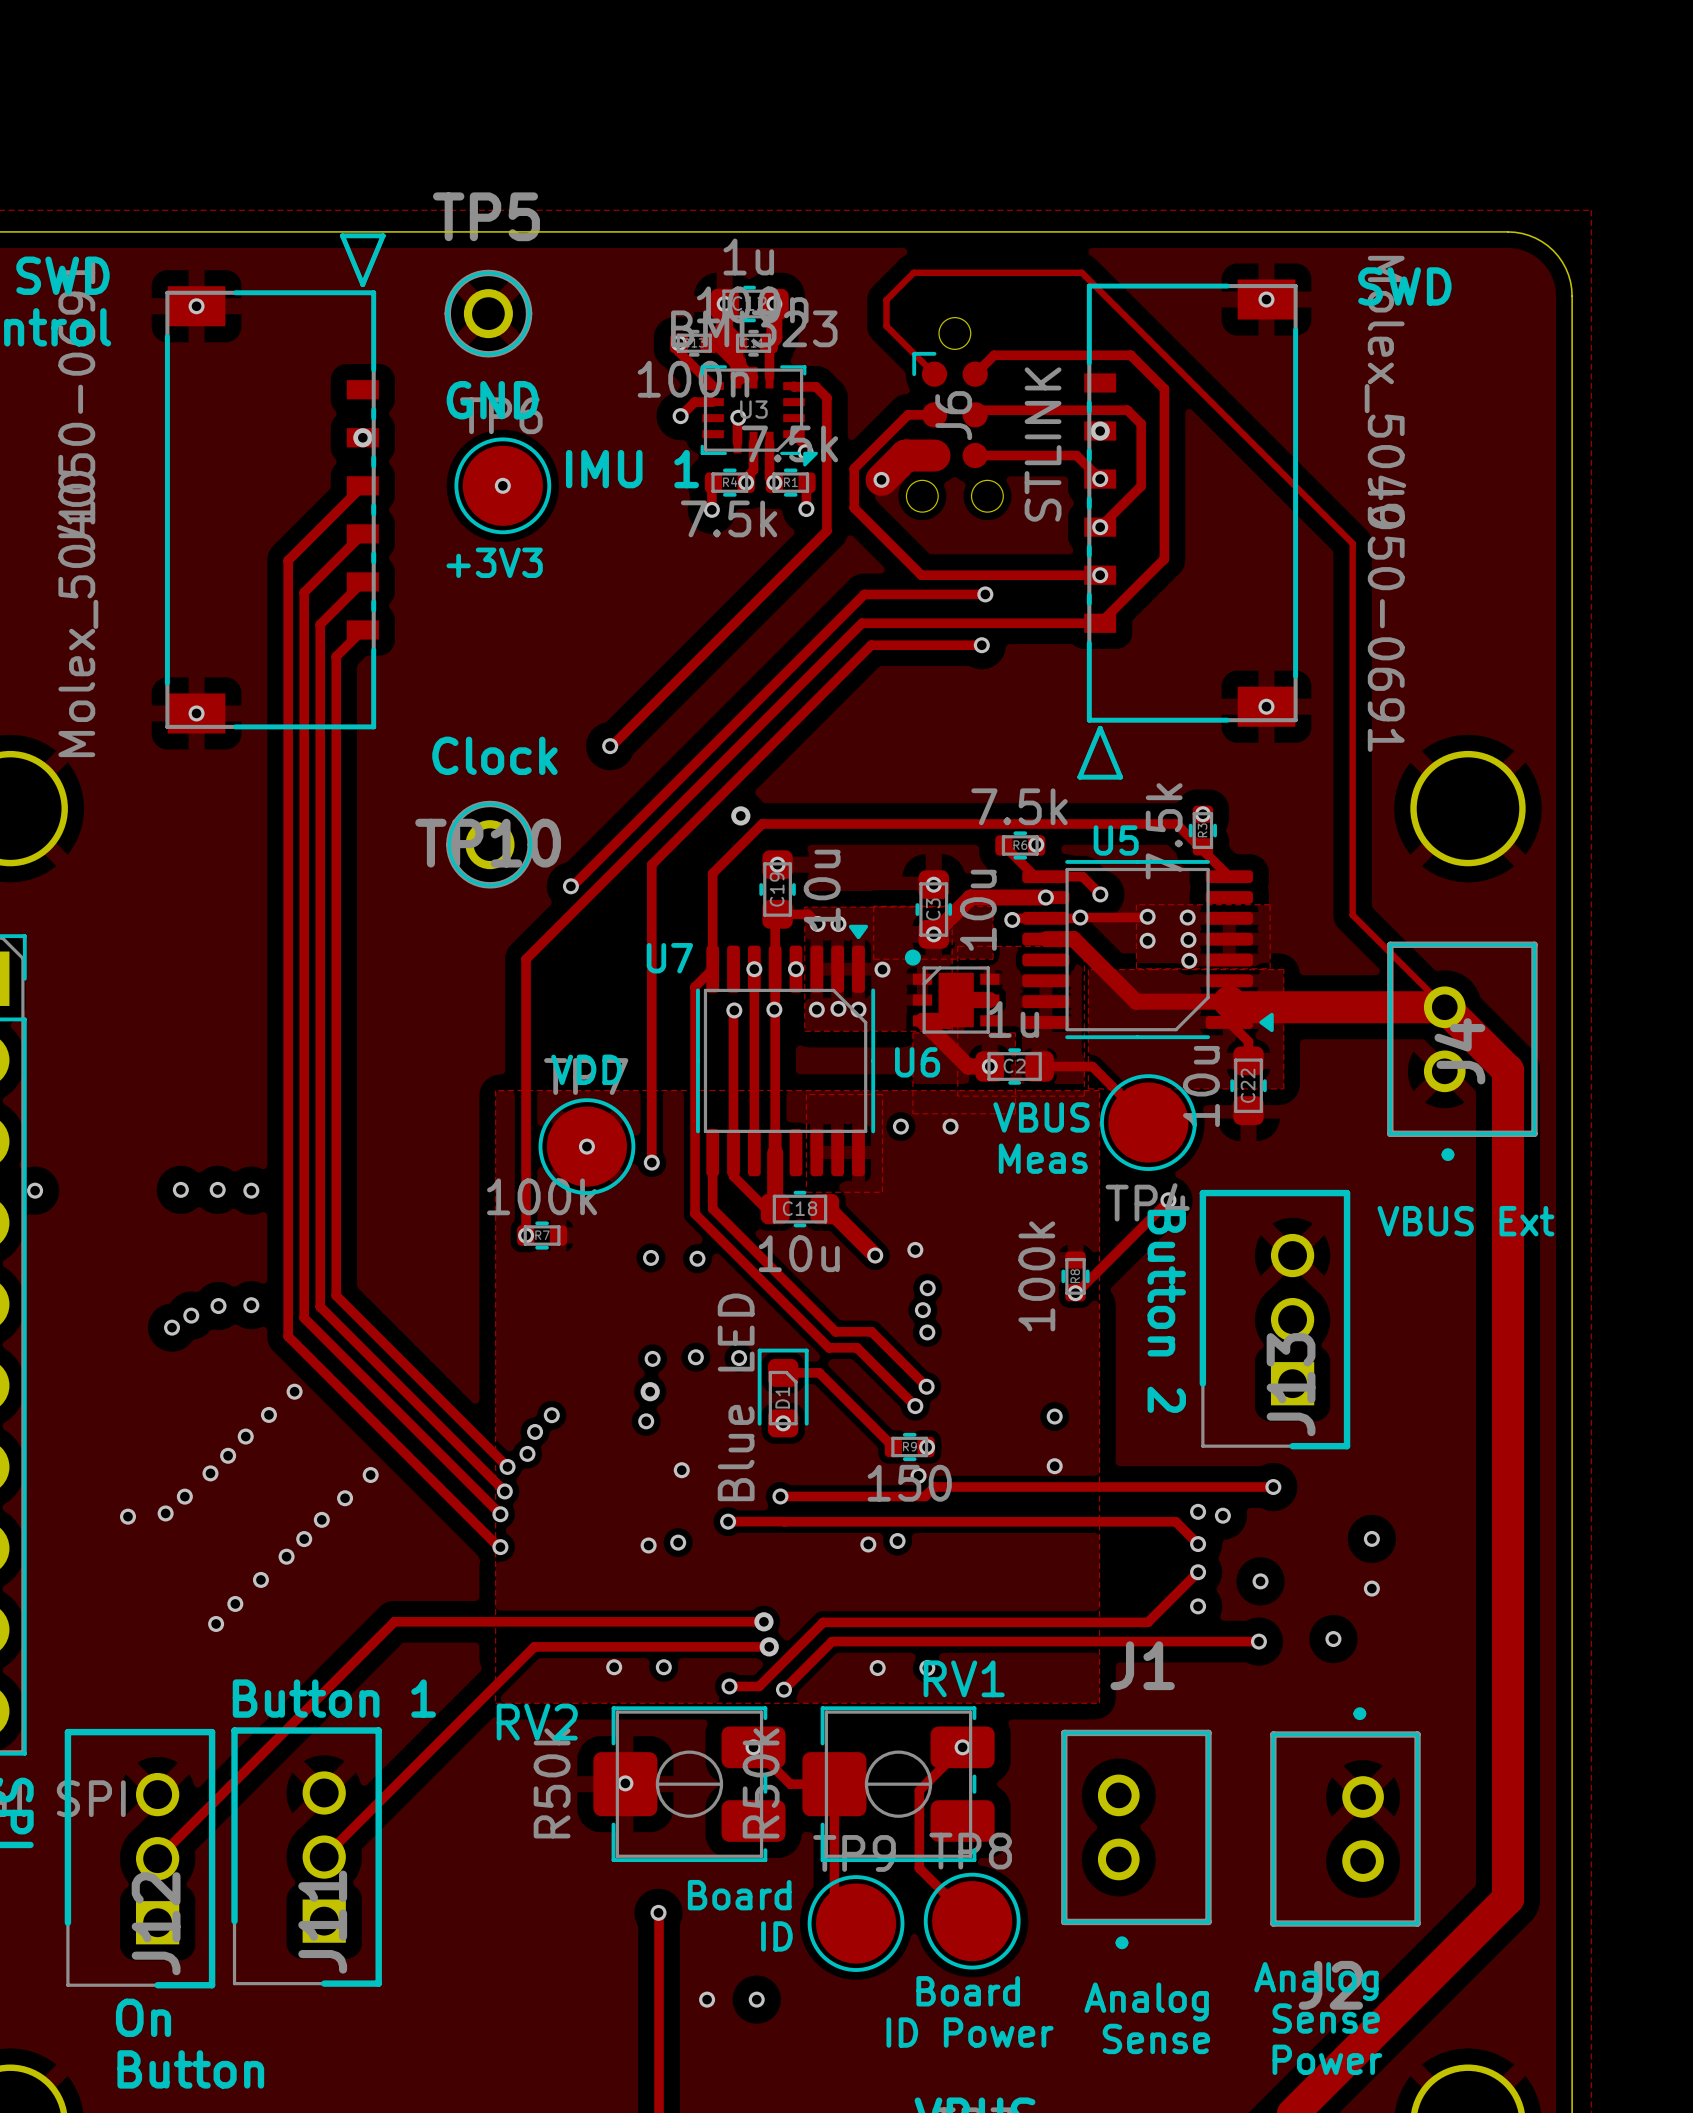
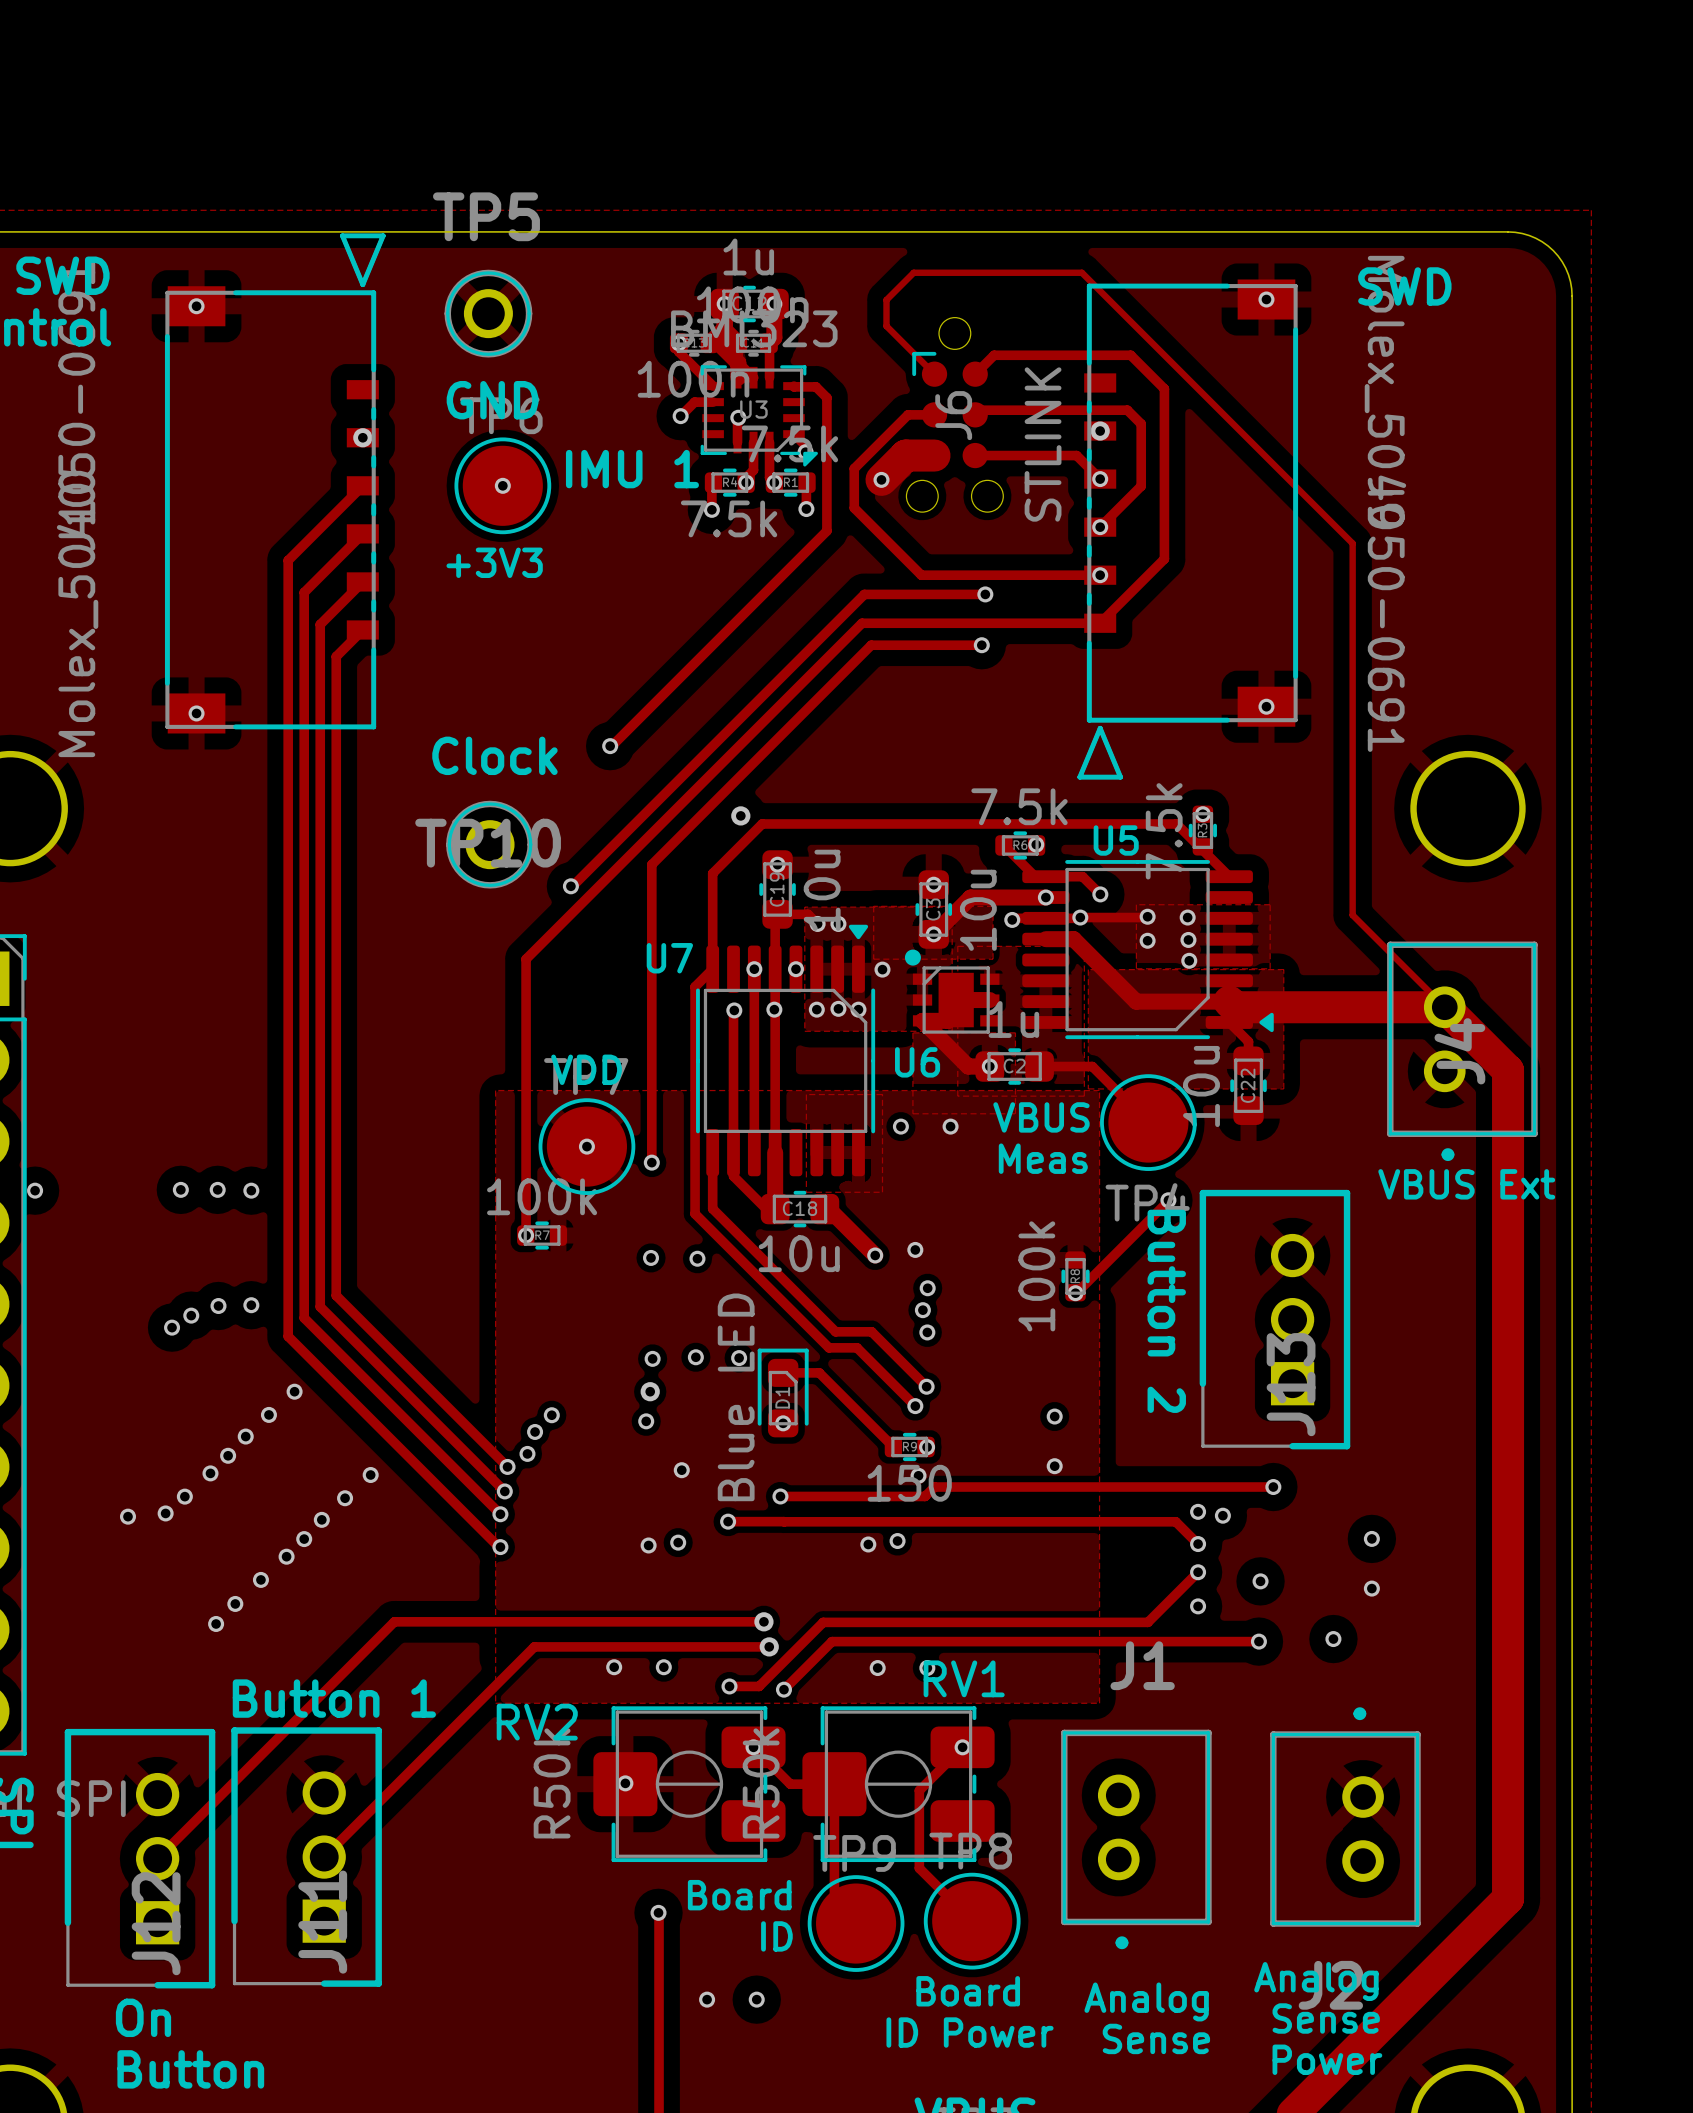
text position: VBUS Ext (1465, 1221) -> VBUS Ext (1466, 1184)

